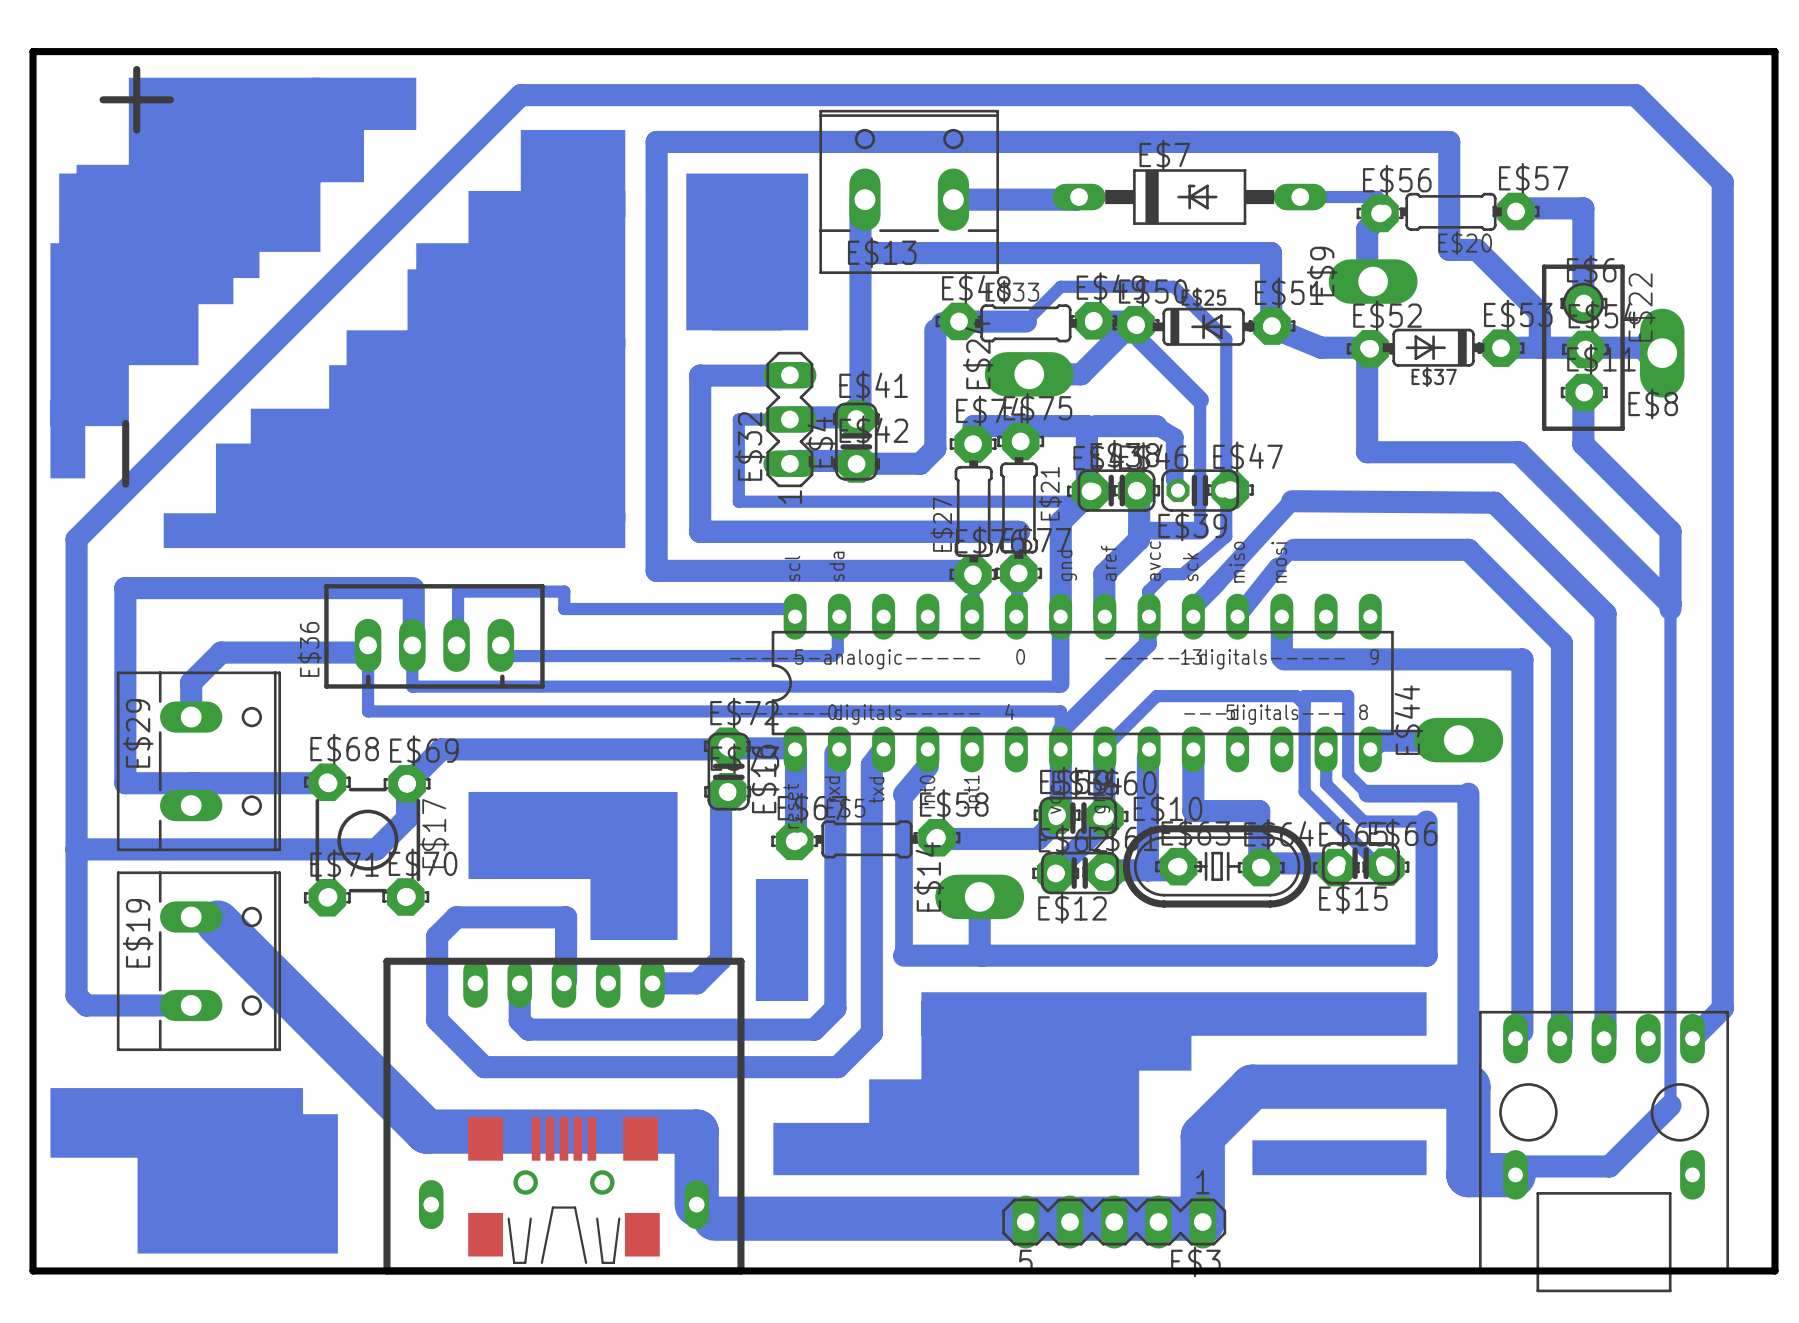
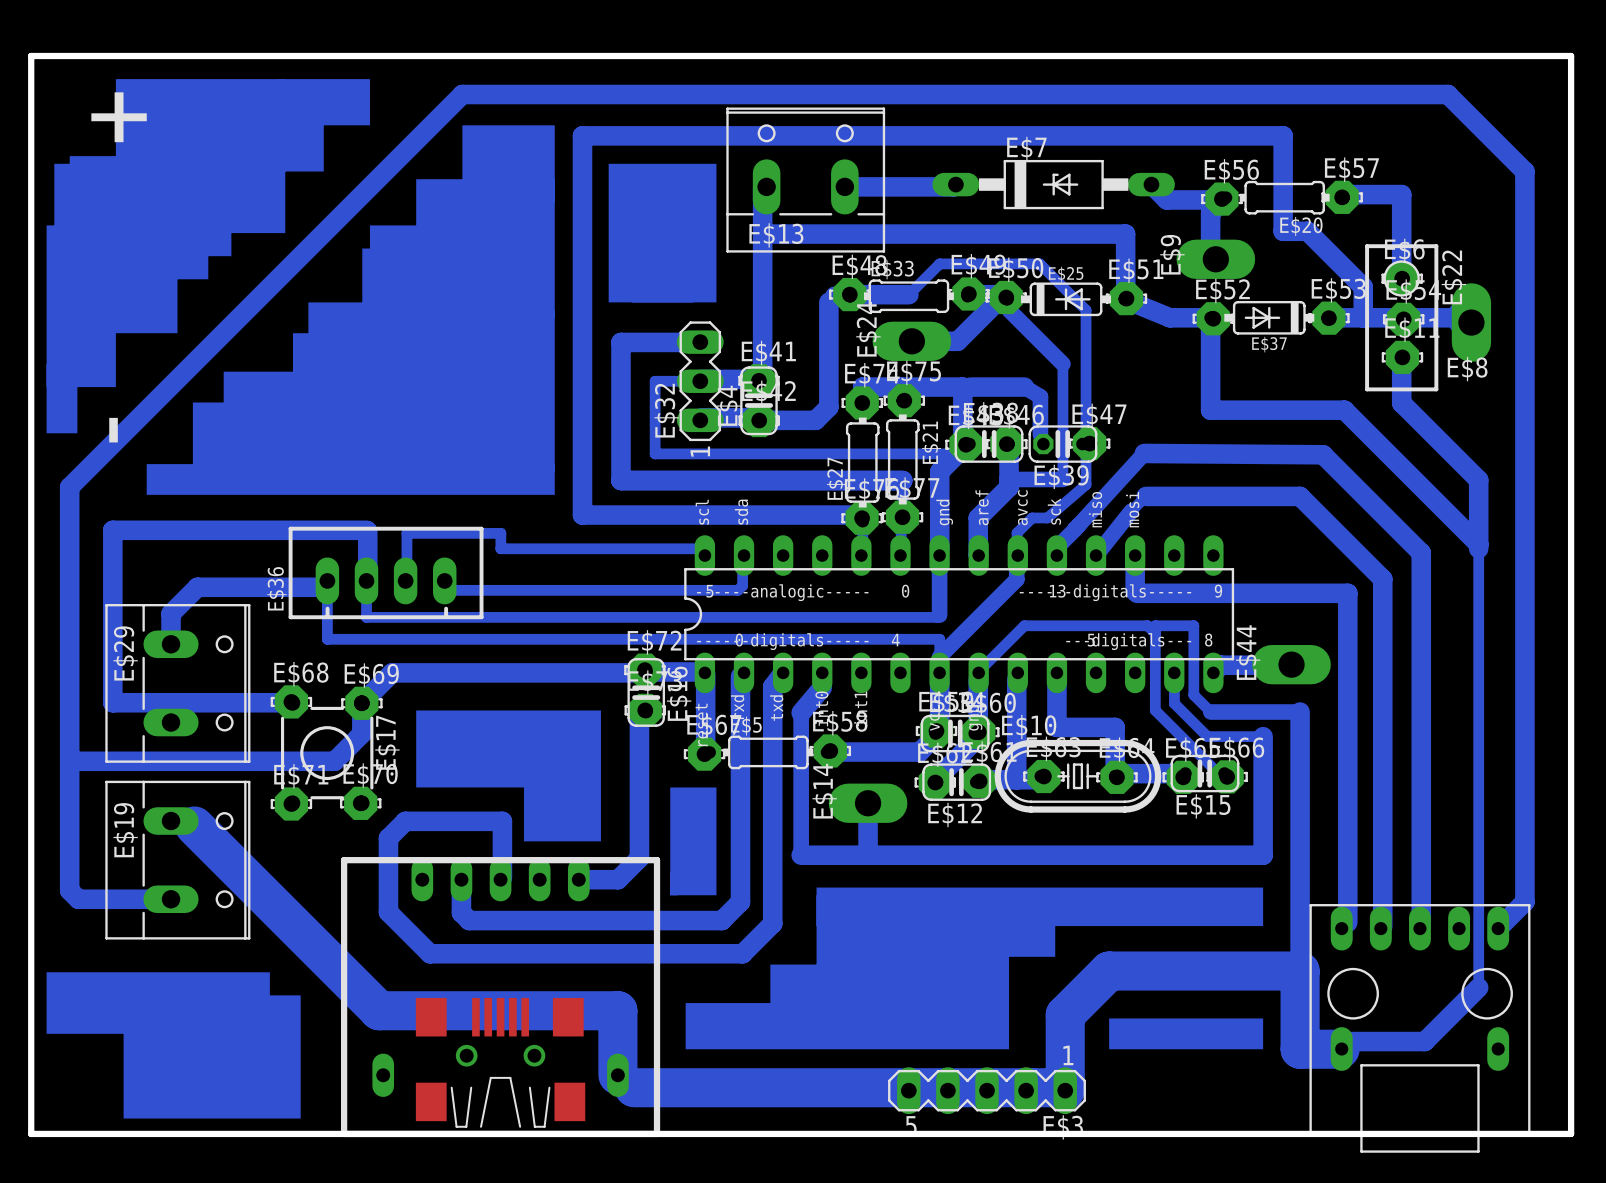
bottom track: (1300, 197) (1377, 197) (1384, 211) -> (1151, 184) (1166, 199) (1223, 199)

